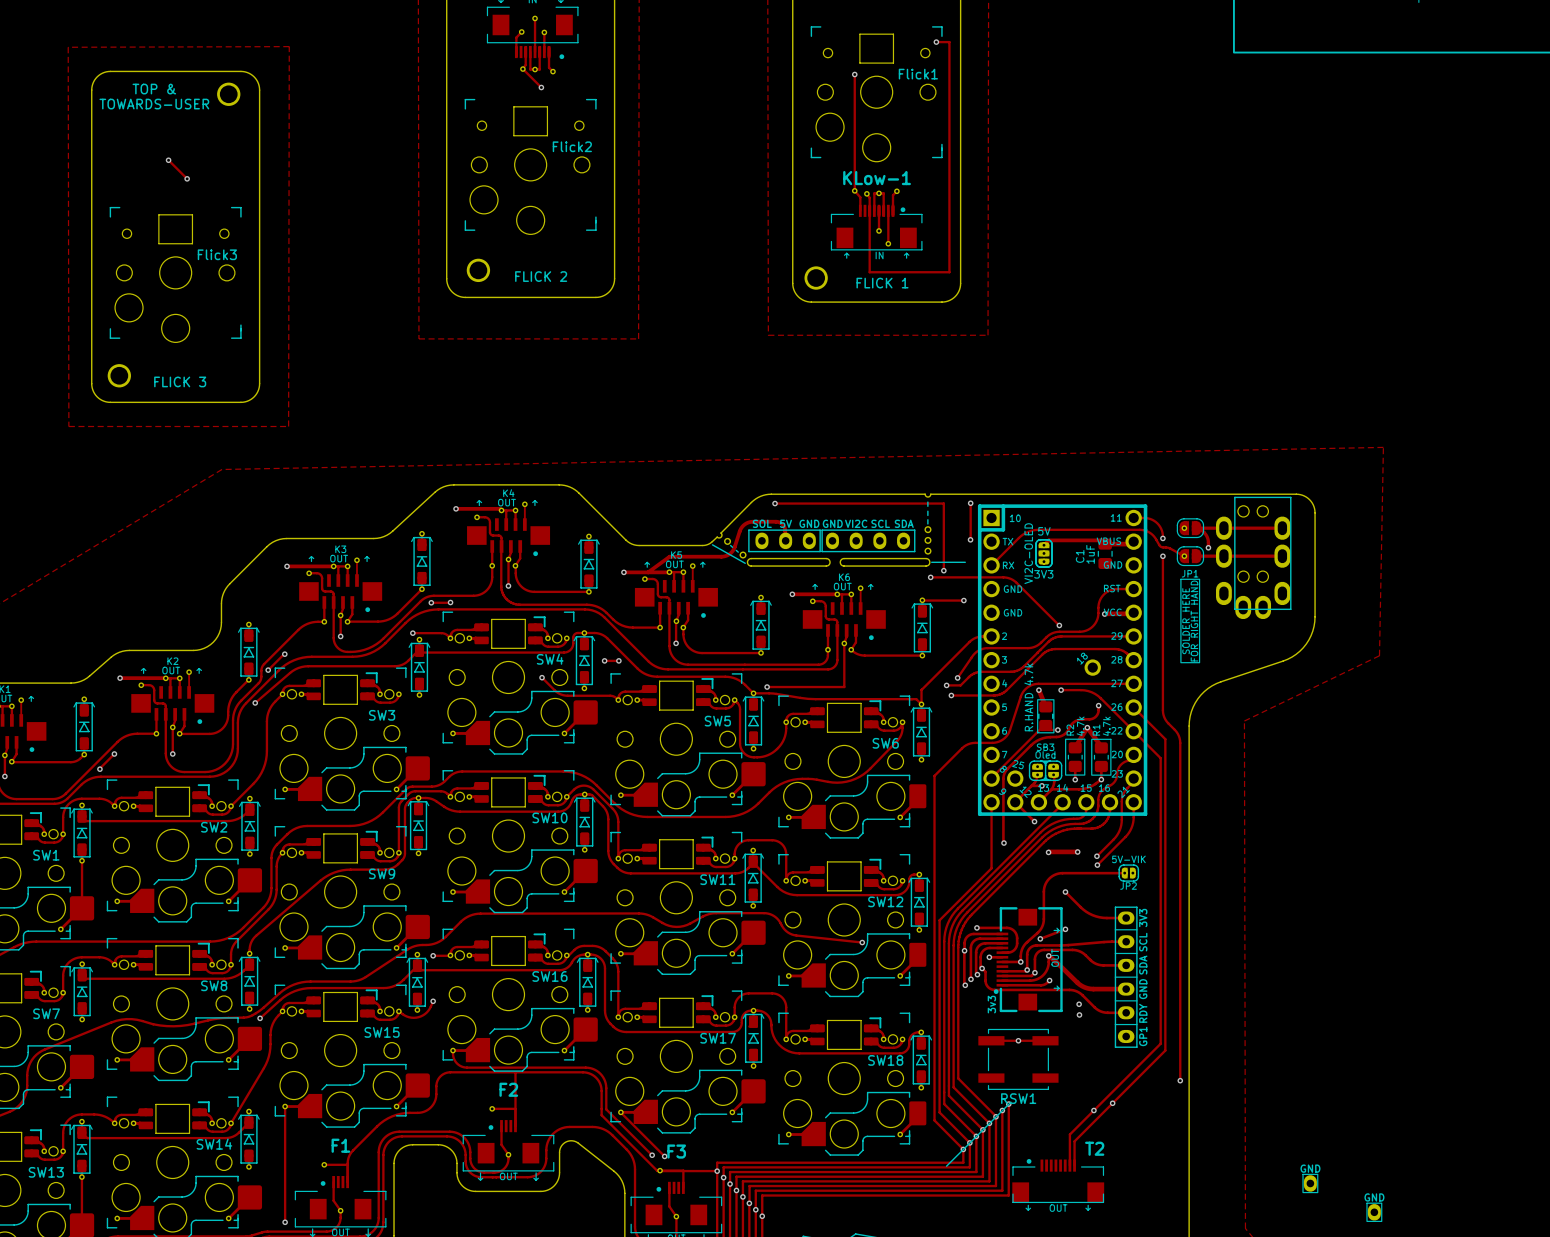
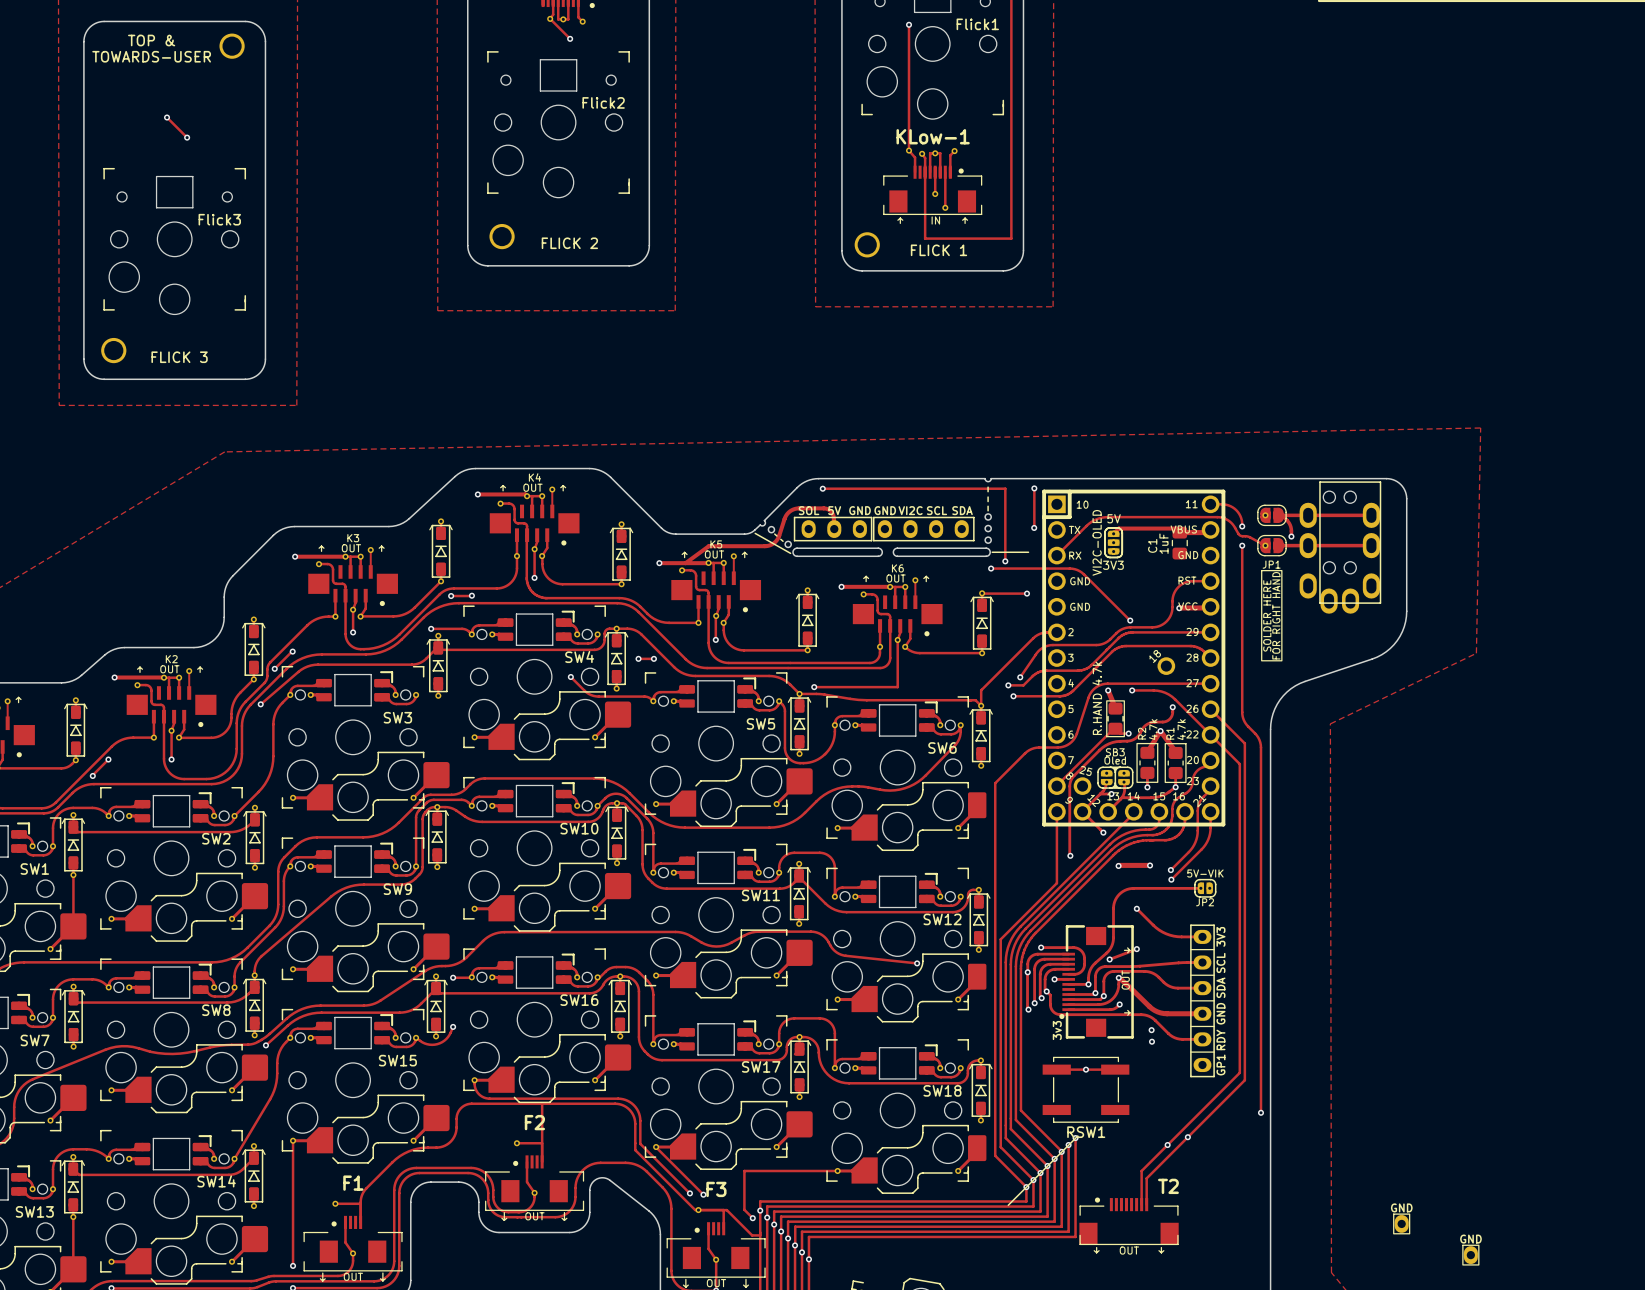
track: none -> (837, 1170) (744, 1170) (744, 1209) (752, 1218)
track: none -> (698, 1210) (726, 1210) (752, 1235) (760, 1235)
track: (660, 1171) (717, 1171) -> none
via: none -> (752, 1218)

